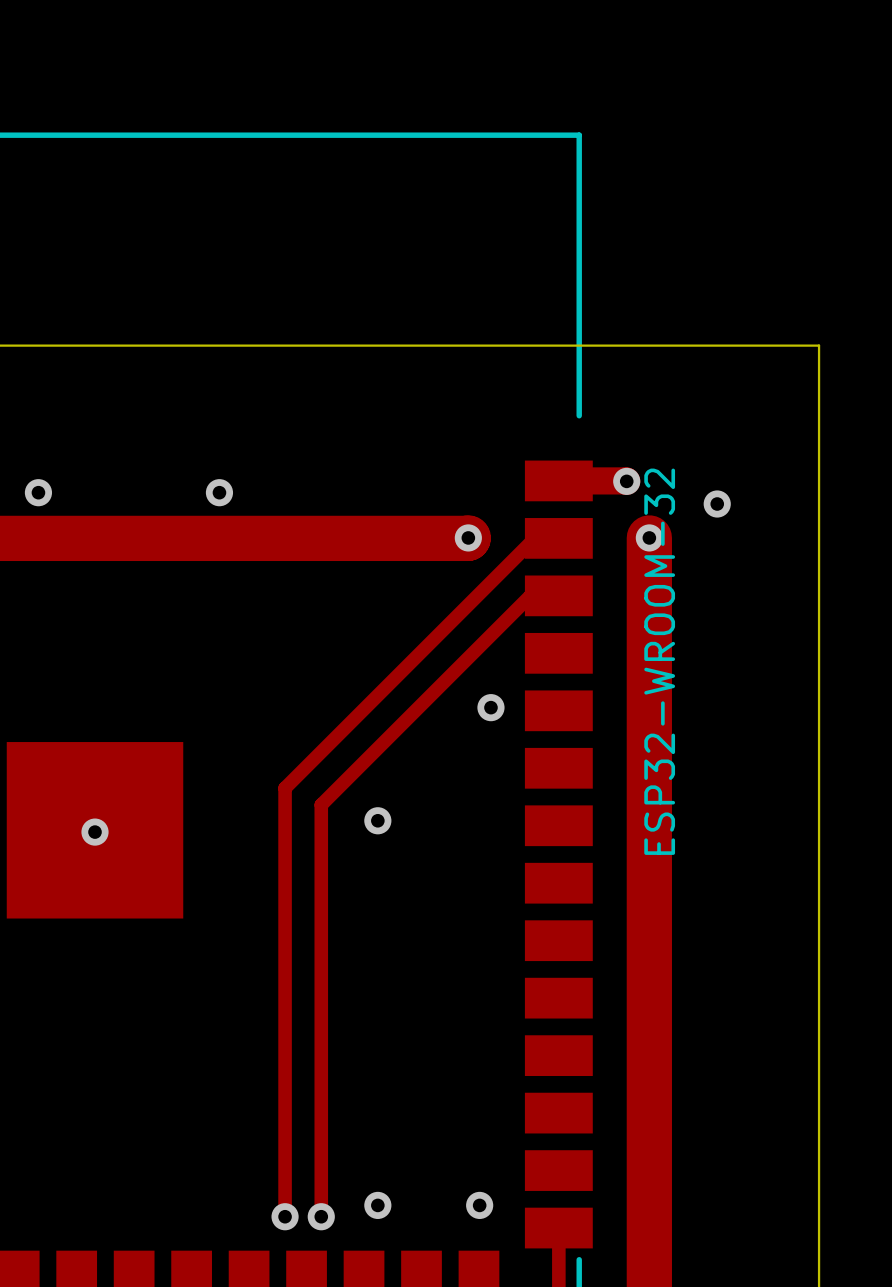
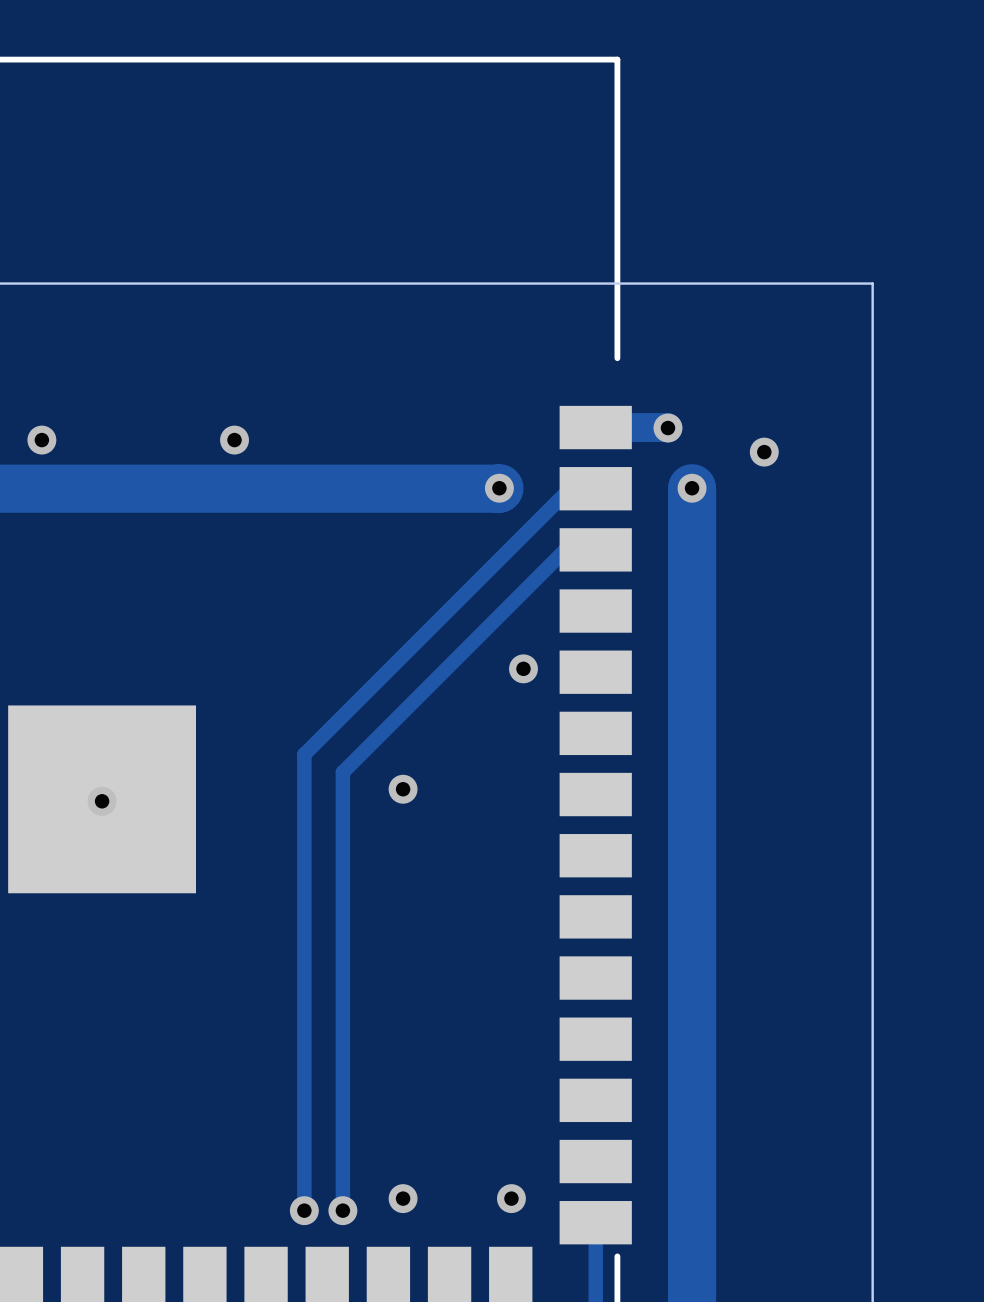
part value: ESP32-WROOM-32 (659, 661) -> none

